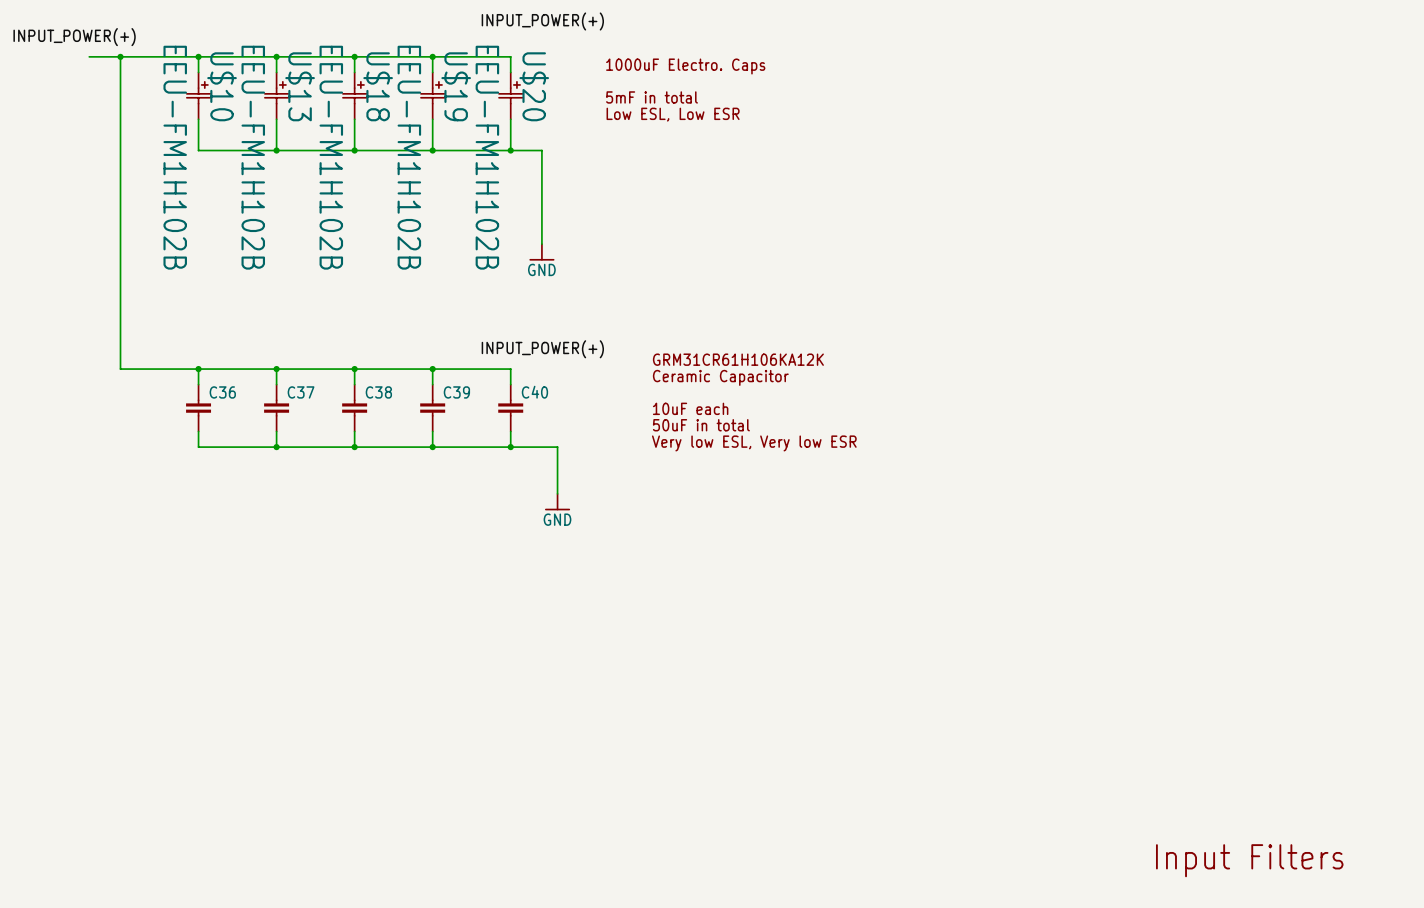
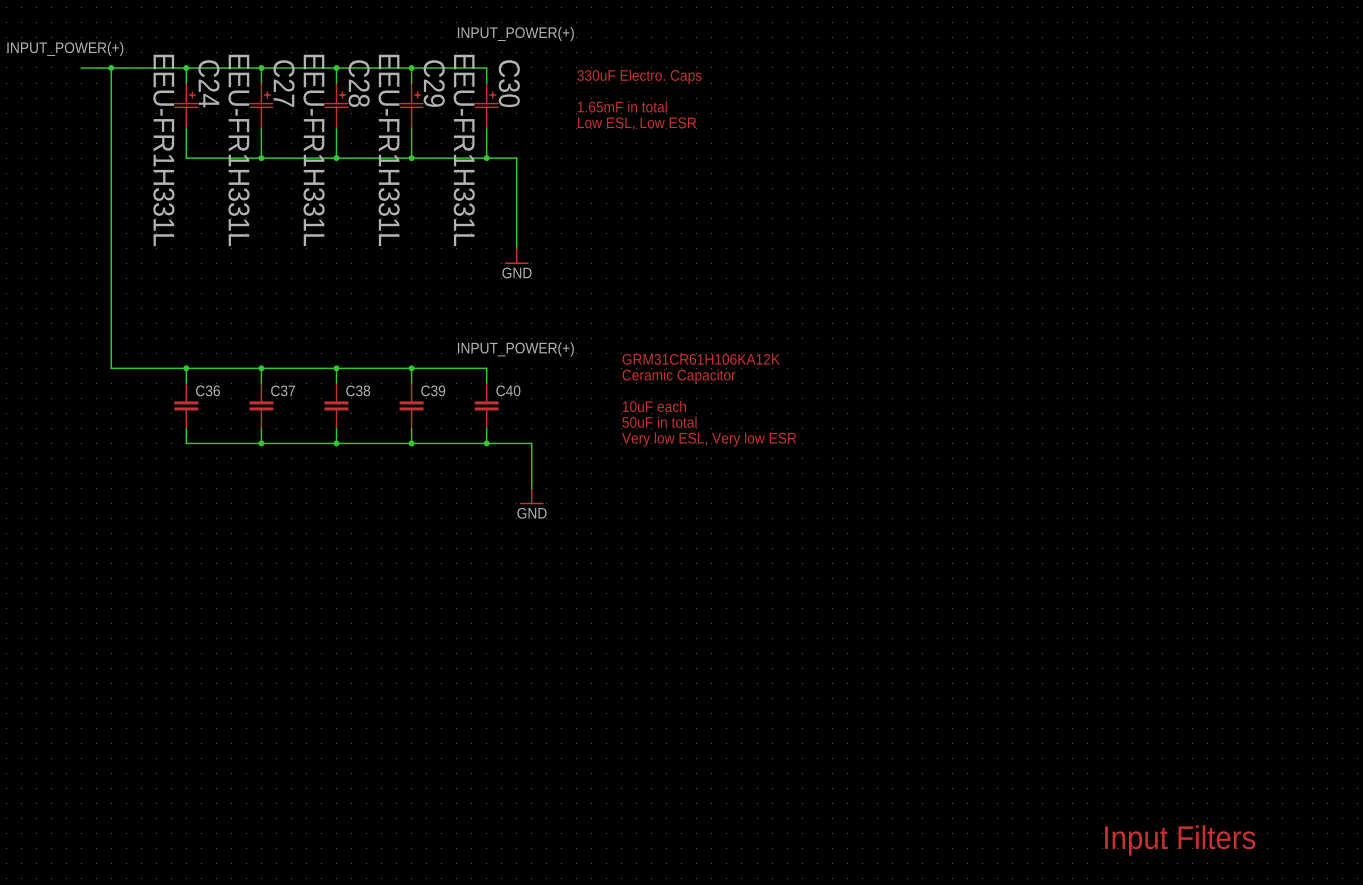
text: 1000uF Electro. Caps (685, 66) -> 330uF Electro. Caps (639, 76)
U$10 name: U$10 (222, 86) -> C24 (208, 83)
U$13 name: U$13 (300, 86) -> C27 (284, 83)
U$18 name: U$18 (378, 86) -> C28 (359, 83)
U$19 name: U$19 (456, 86) -> C29 (434, 83)
U$20 name: U$20 (534, 86) -> C30 (509, 83)
text: 5mF in total (652, 97) -> 1.65mF in total (622, 106)
U$10 value: EEU-FM1H102B (175, 157) -> EEU-FR1H331L (163, 150)
U$13 value: EEU-FM1H102B (253, 157) -> EEU-FR1H331L (238, 150)
U$18 value: EEU-FM1H102B (331, 157) -> EEU-FR1H331L (314, 150)
U$19 value: EEU-FM1H102B (409, 157) -> EEU-FR1H331L (389, 150)
U$20 value: EEU-FM1H102B (487, 157) -> EEU-FR1H331L (464, 150)

